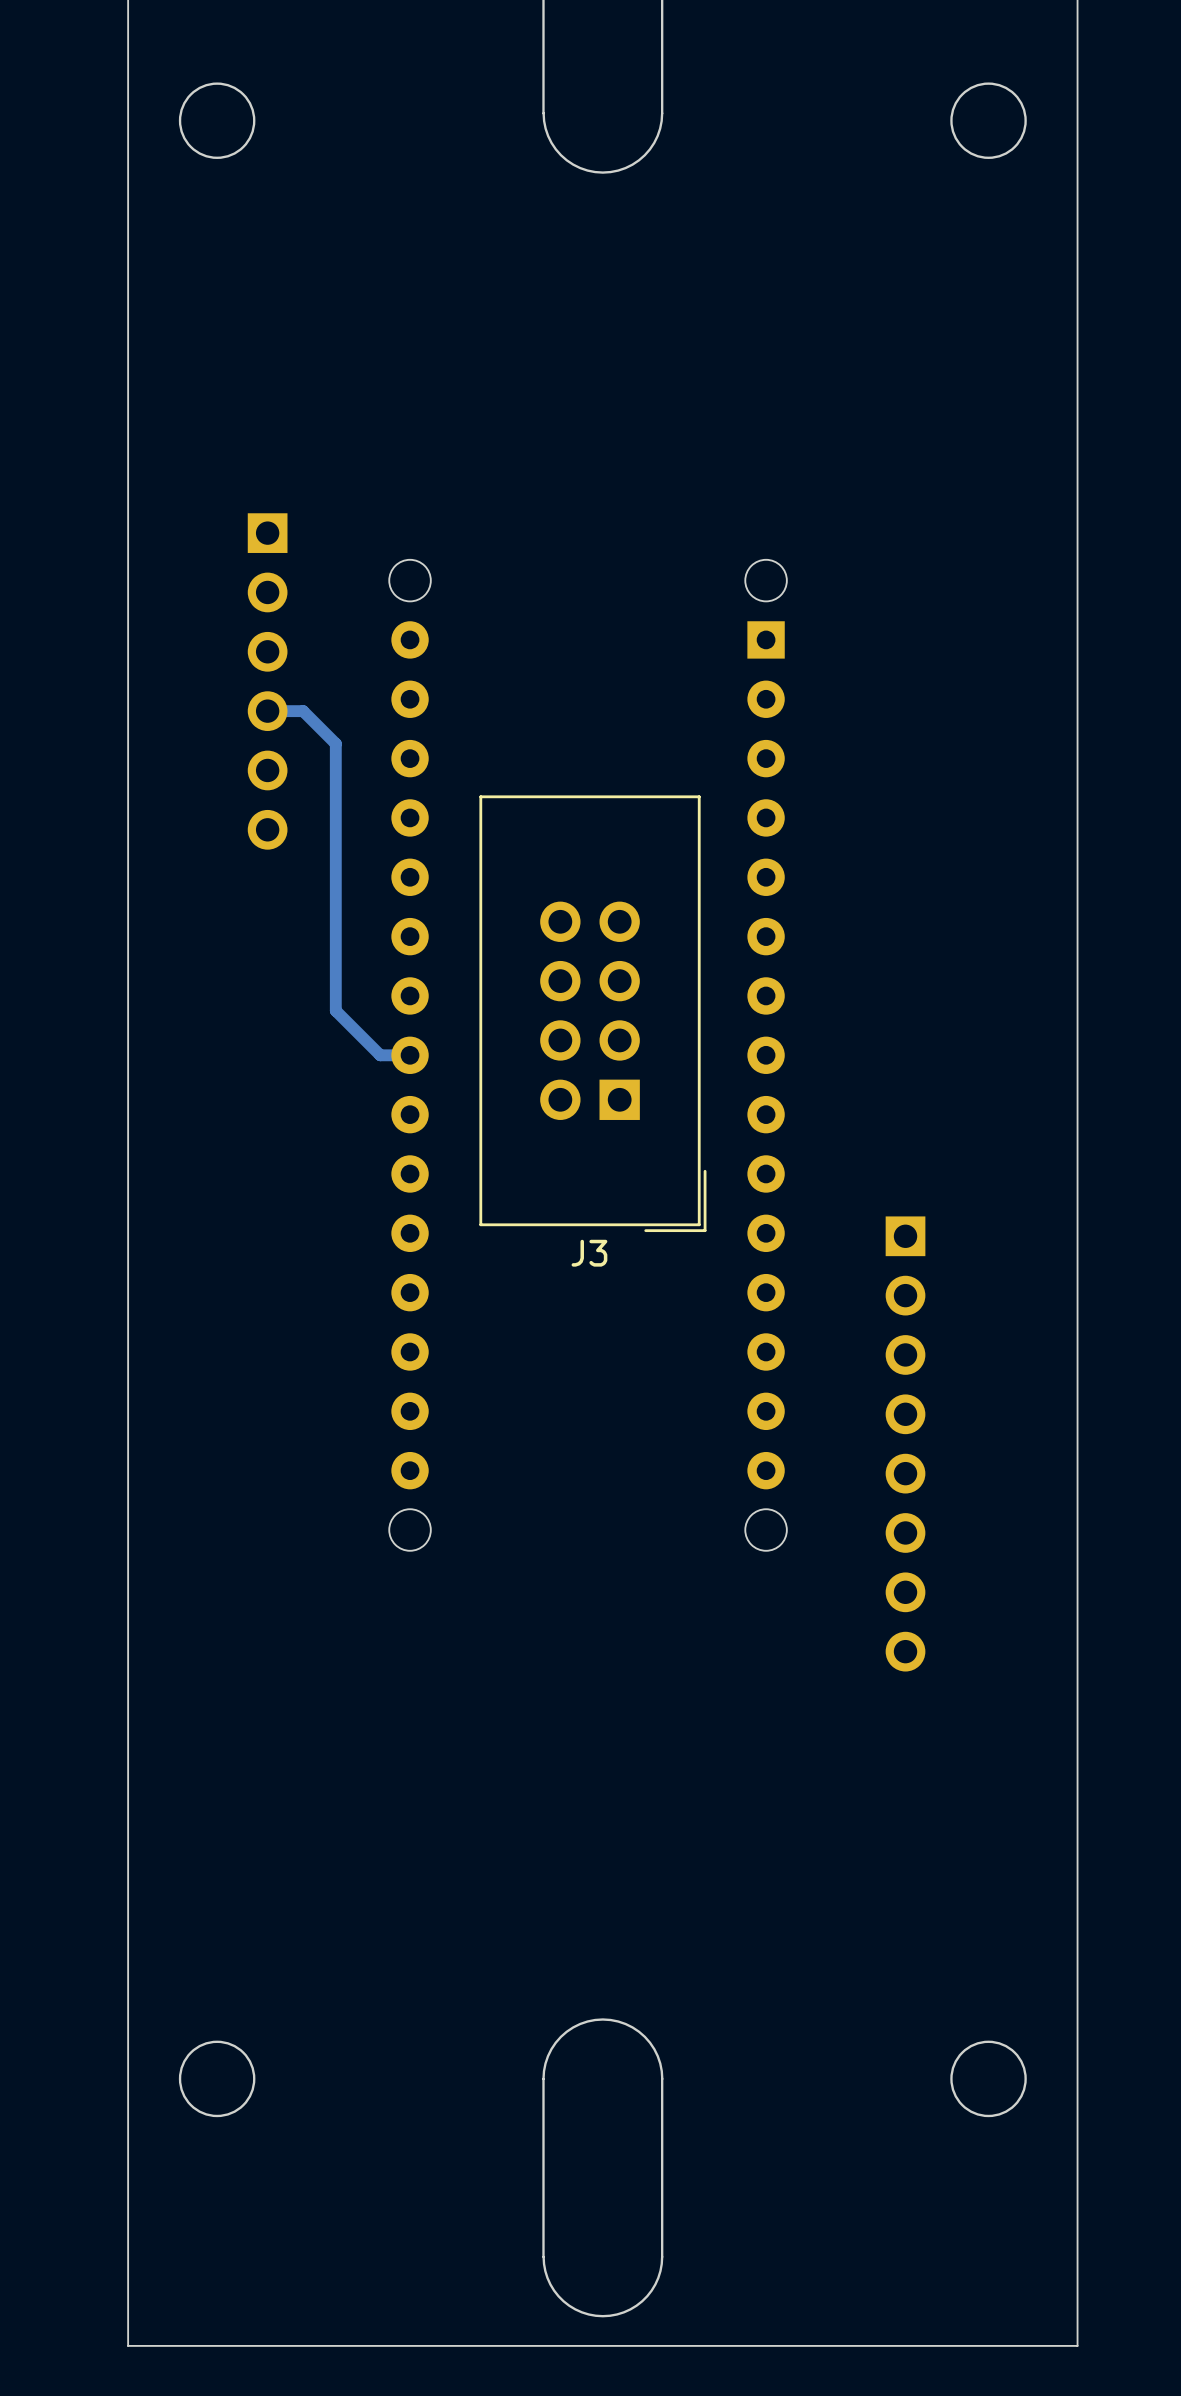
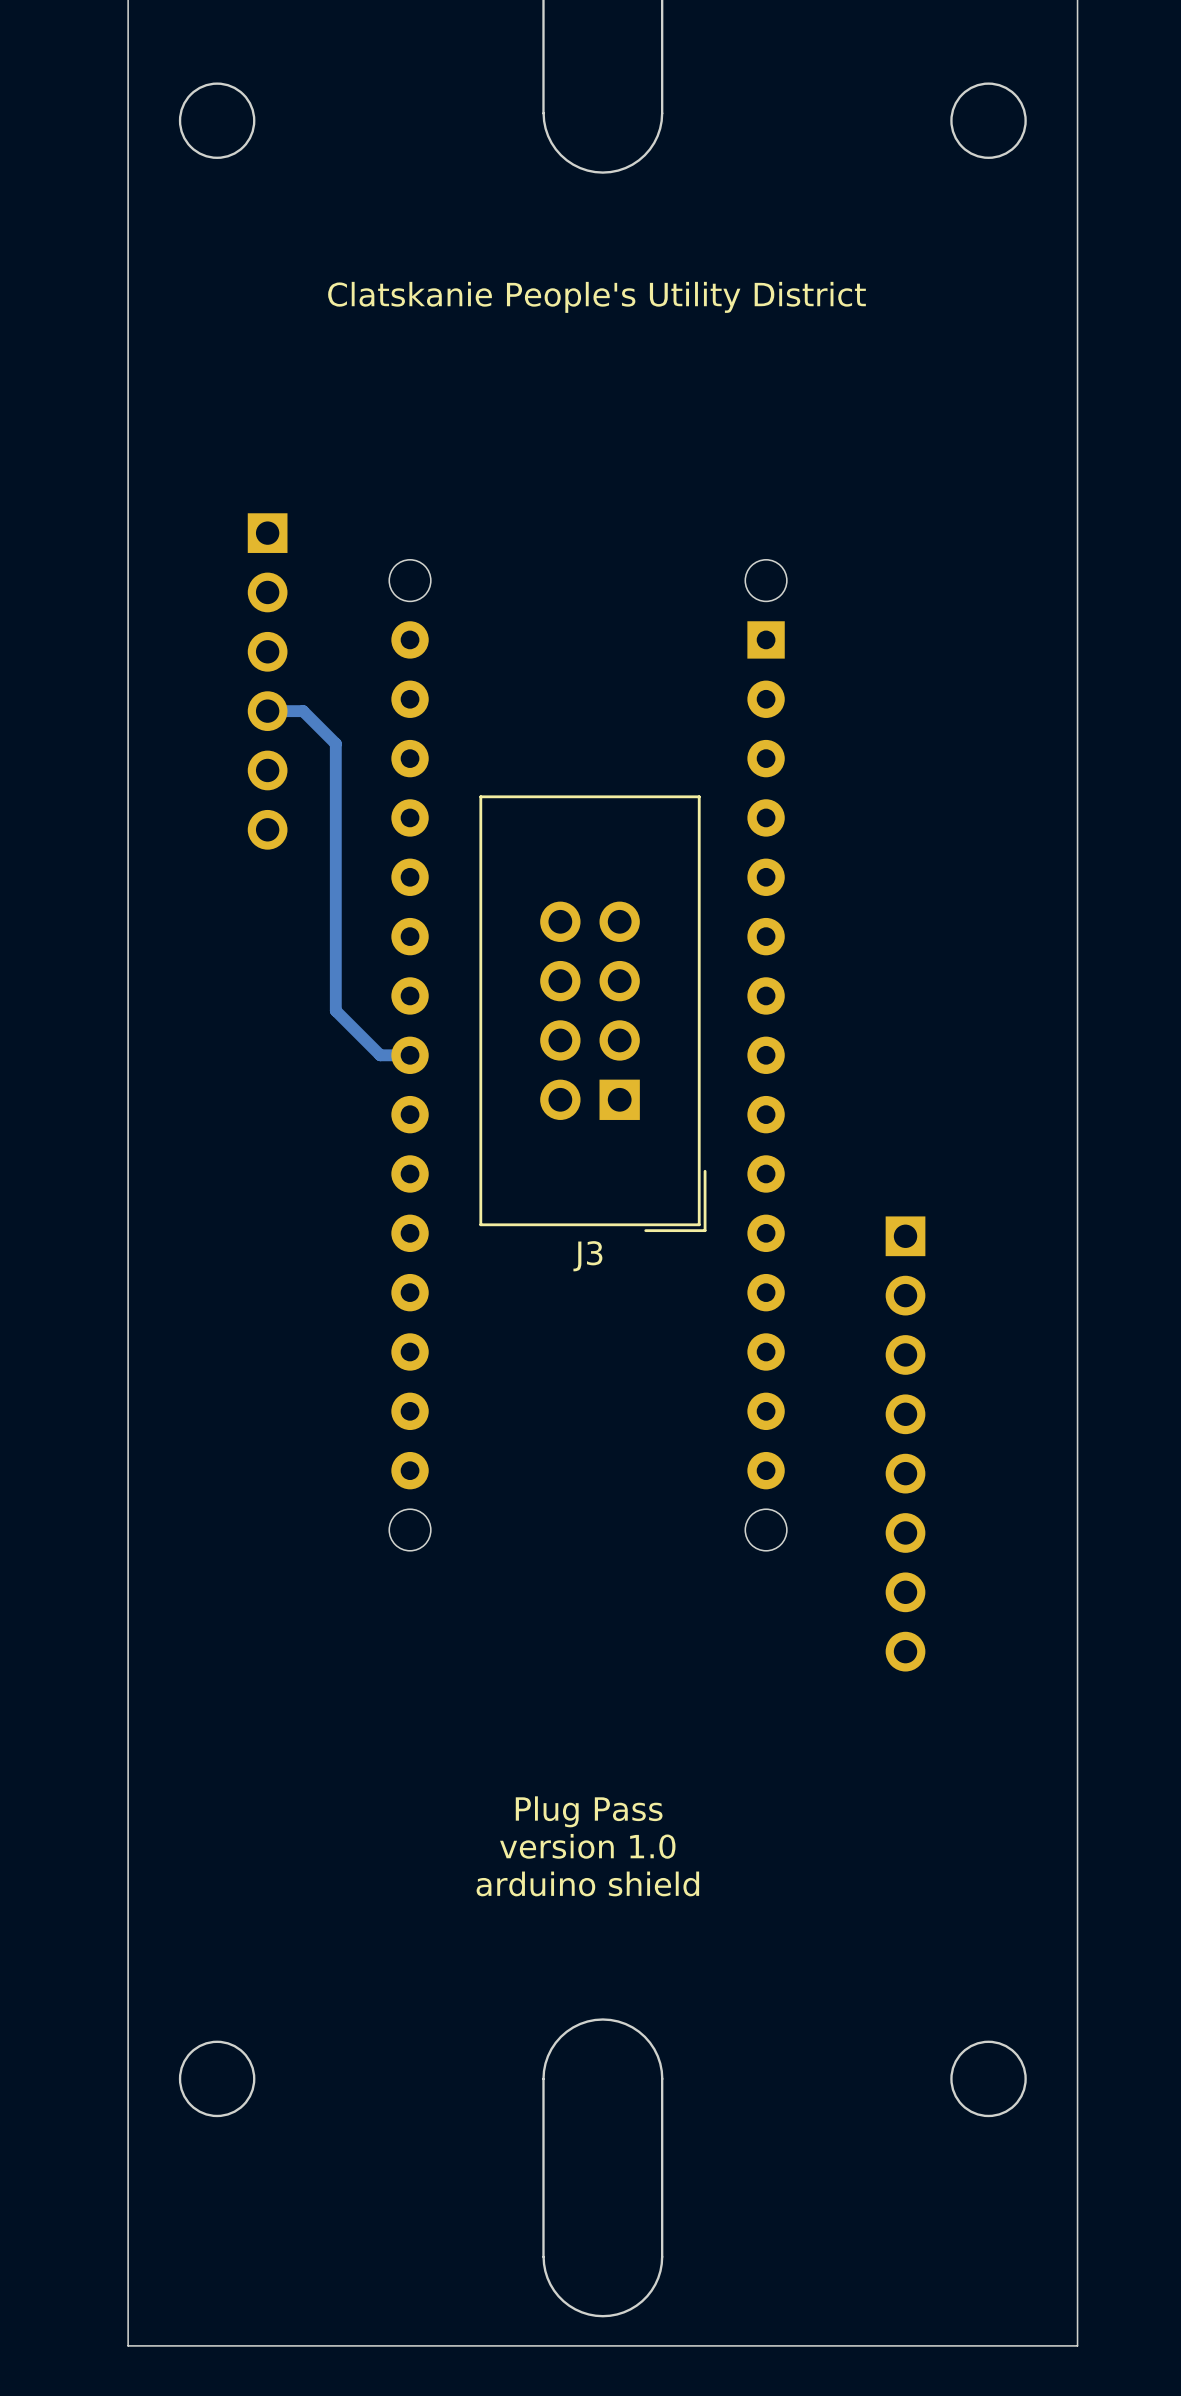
text: none -> Clatskanie People's Utility District (597, 297)
text: none -> Plug Pass (589, 1811)
text: none -> version 1.0 (587, 1846)
text: none -> arduino shield (587, 1883)

